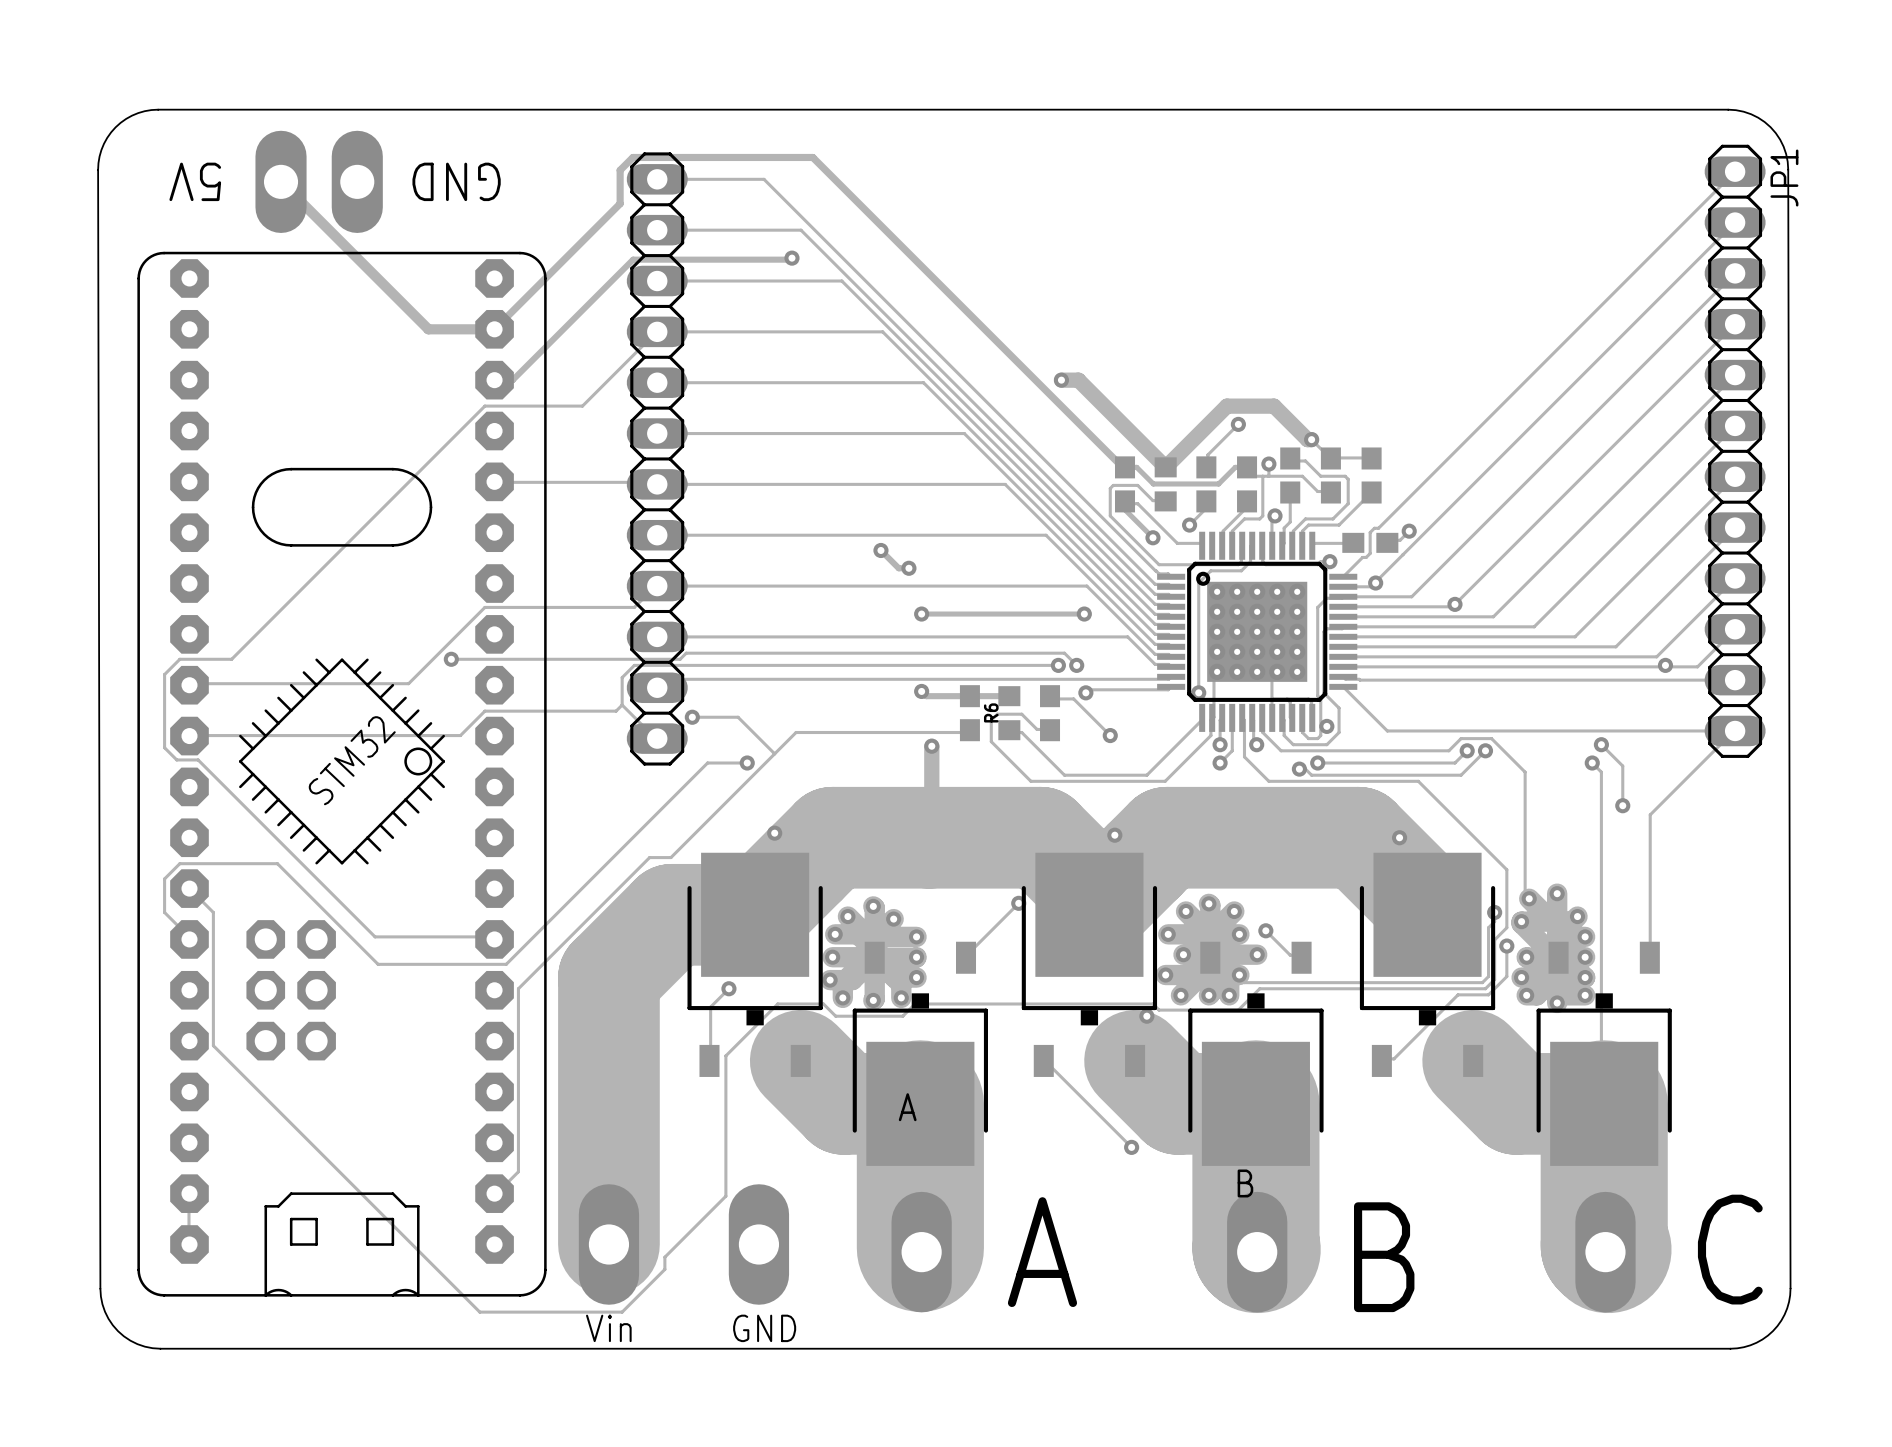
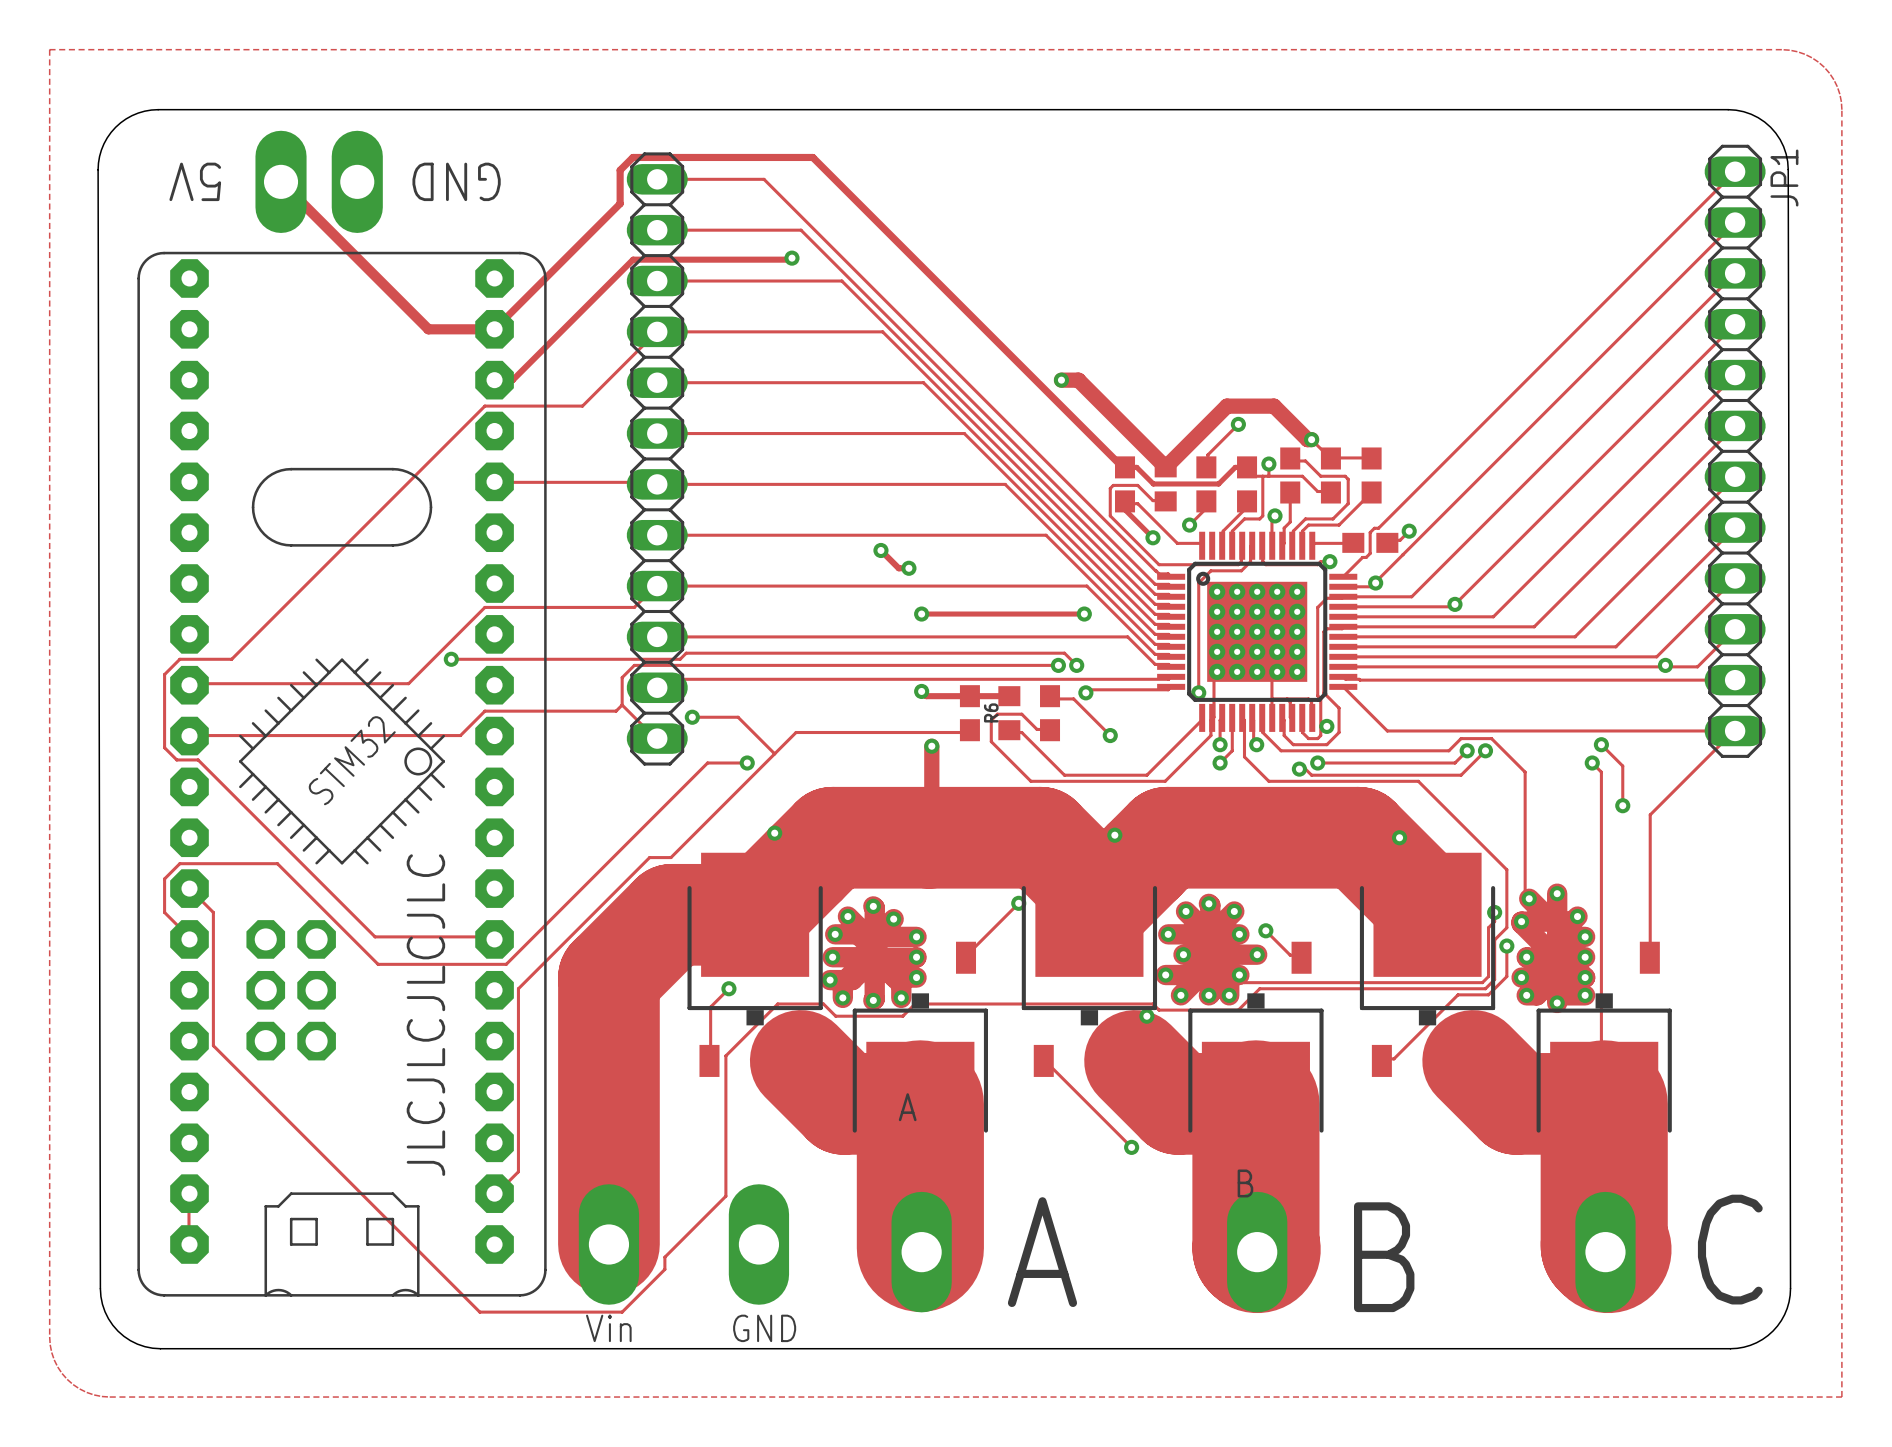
zone outline: none -> (49, 49) (49, 1336) (51, 1352) (57, 1366) (73, 1384) (86, 1392) (109, 1397) (1841, 1397) (1841, 109) (1837, 86) (1829, 73) (1818, 62) (1804, 54) (1781, 49) (49, 49)
text: none -> JLCJLCJLCJLC (425, 1015)

